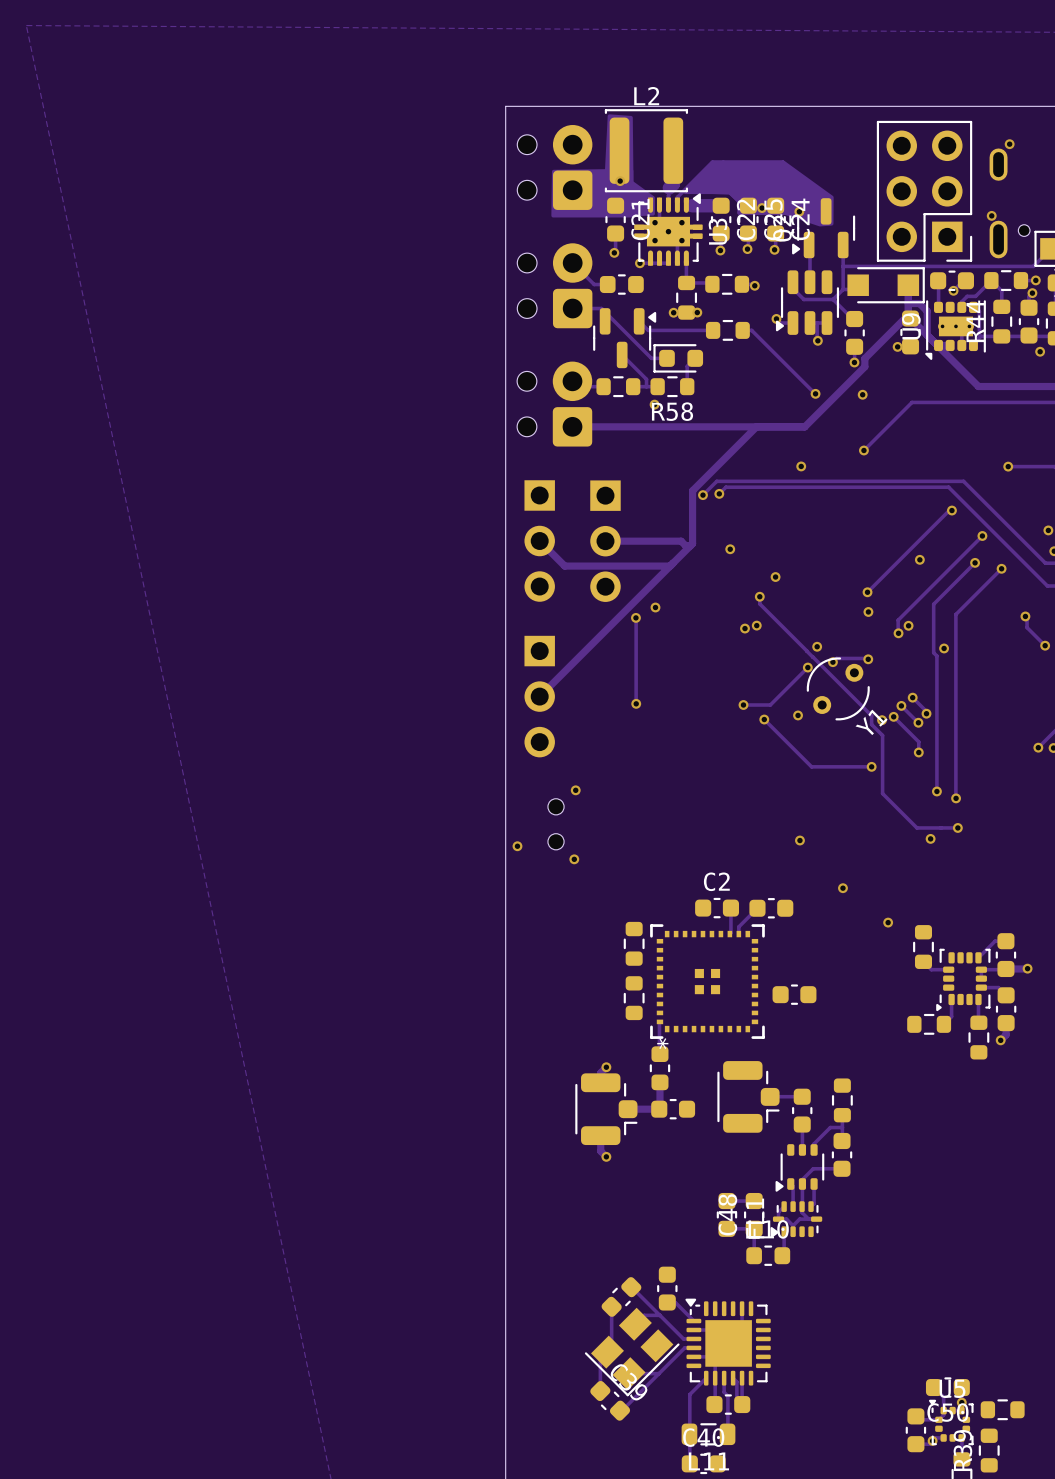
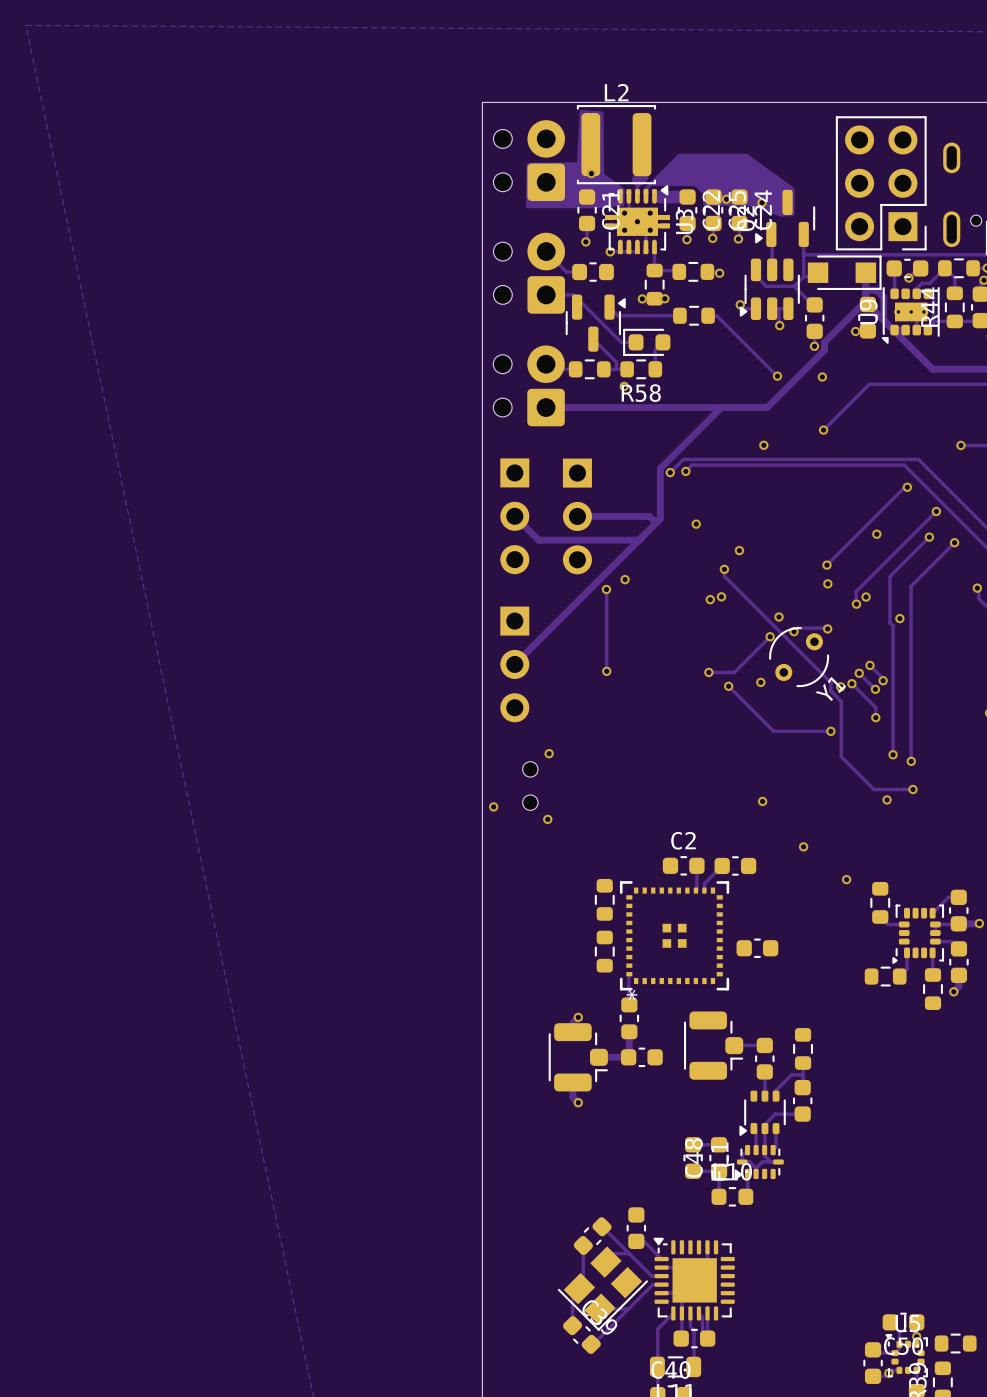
via: (1009, 144) -> none
via: (991, 215) -> none

